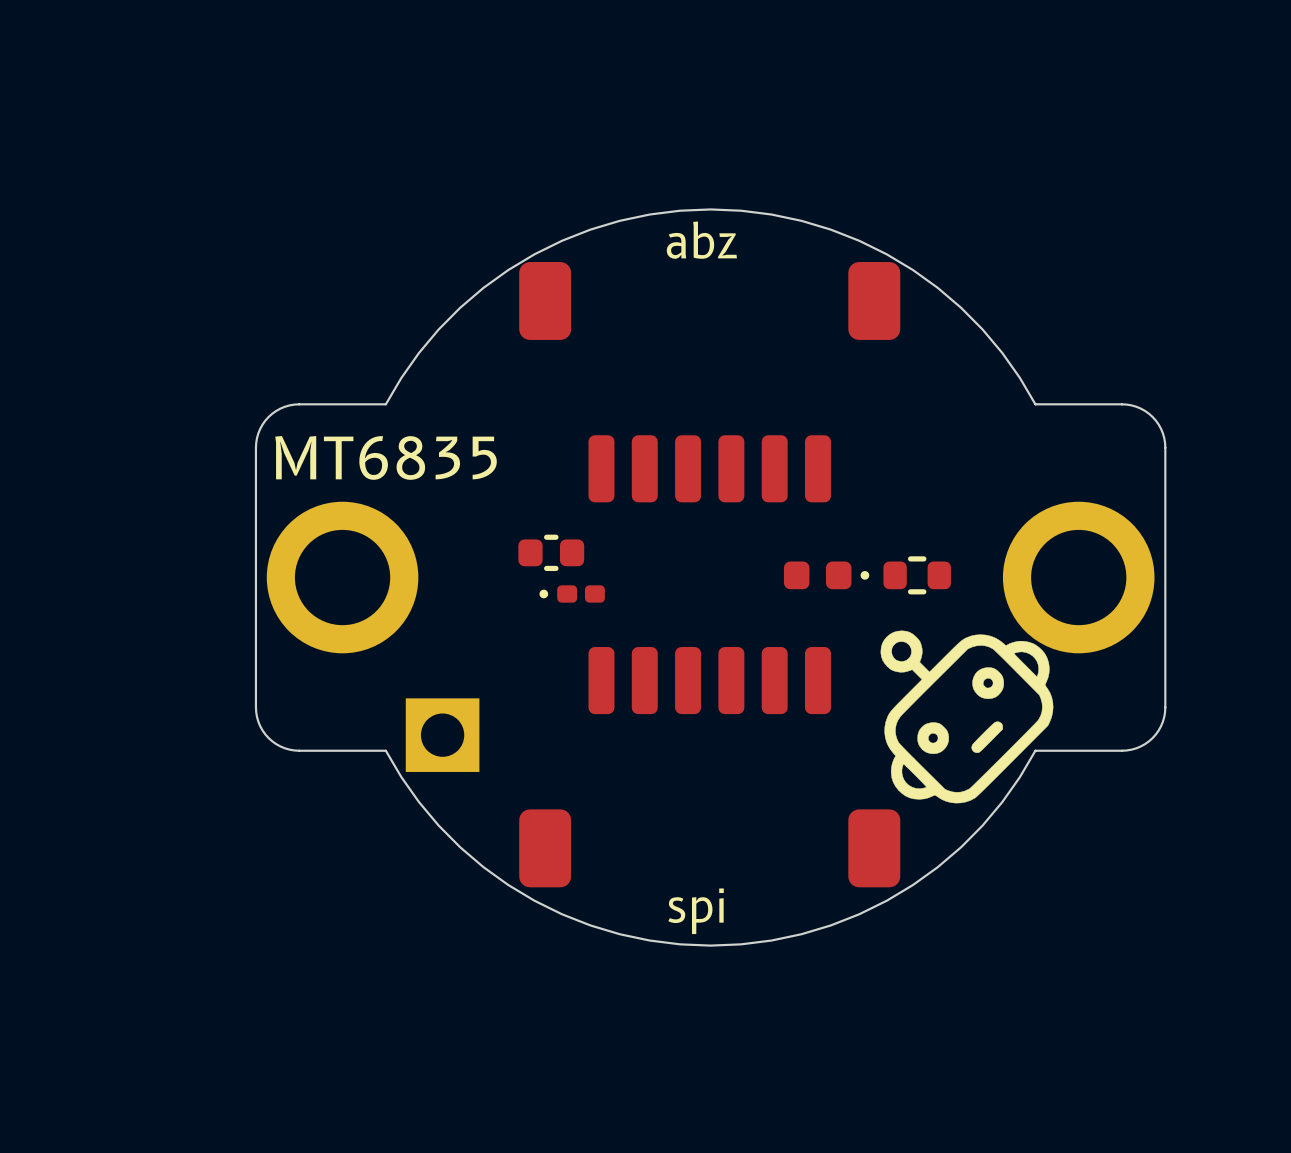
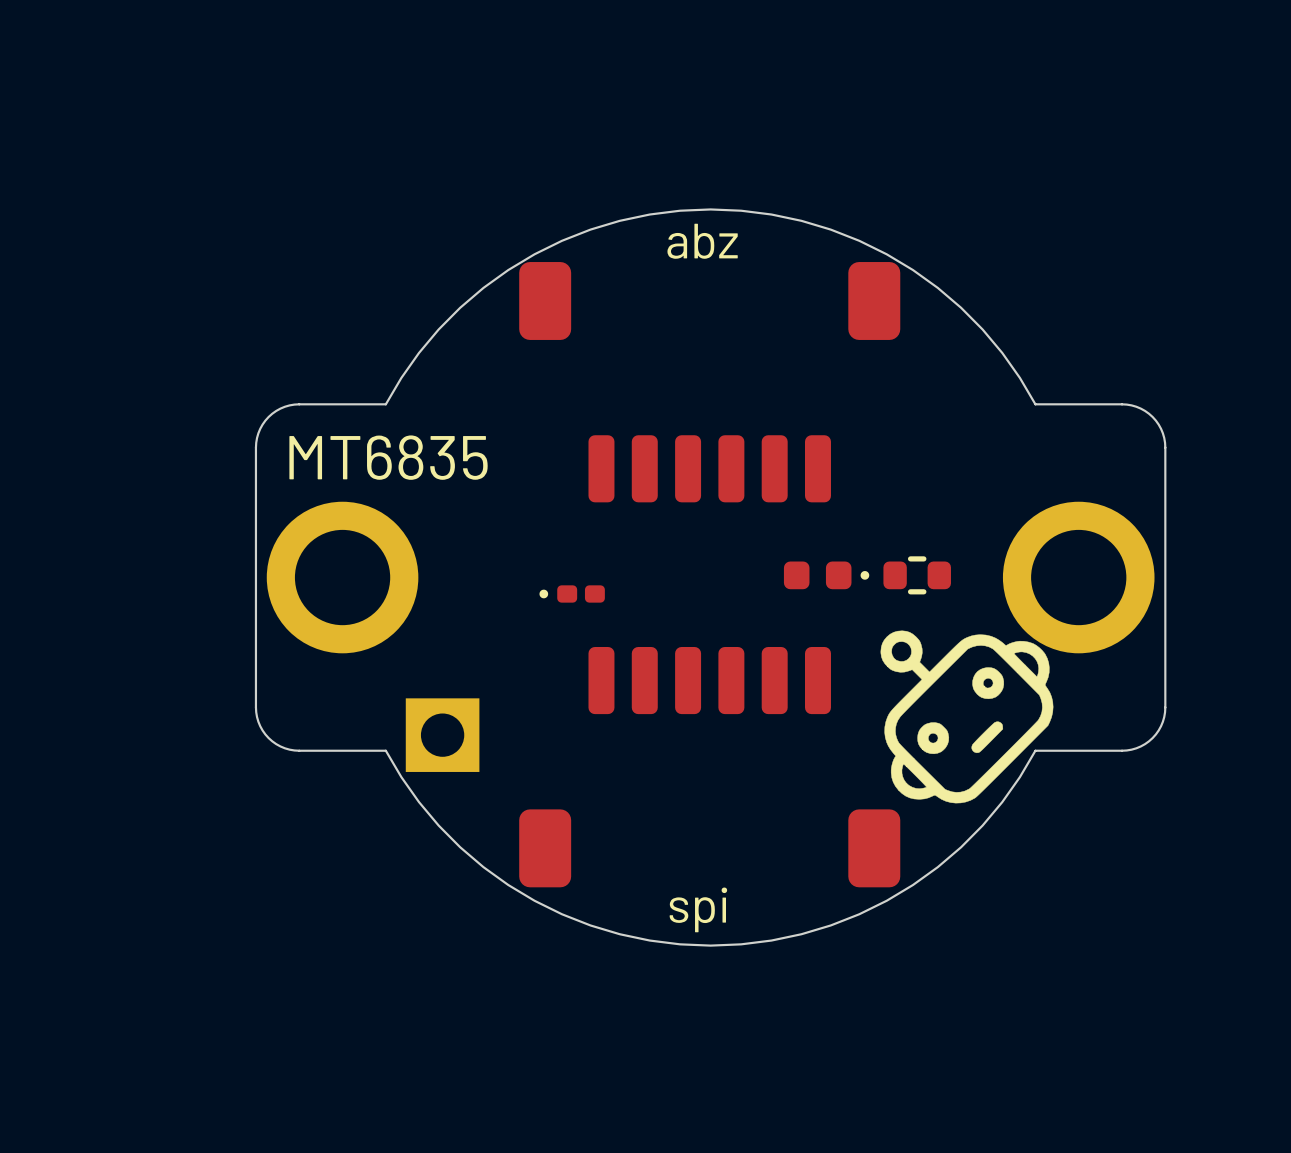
part: (551, 552) -> none

